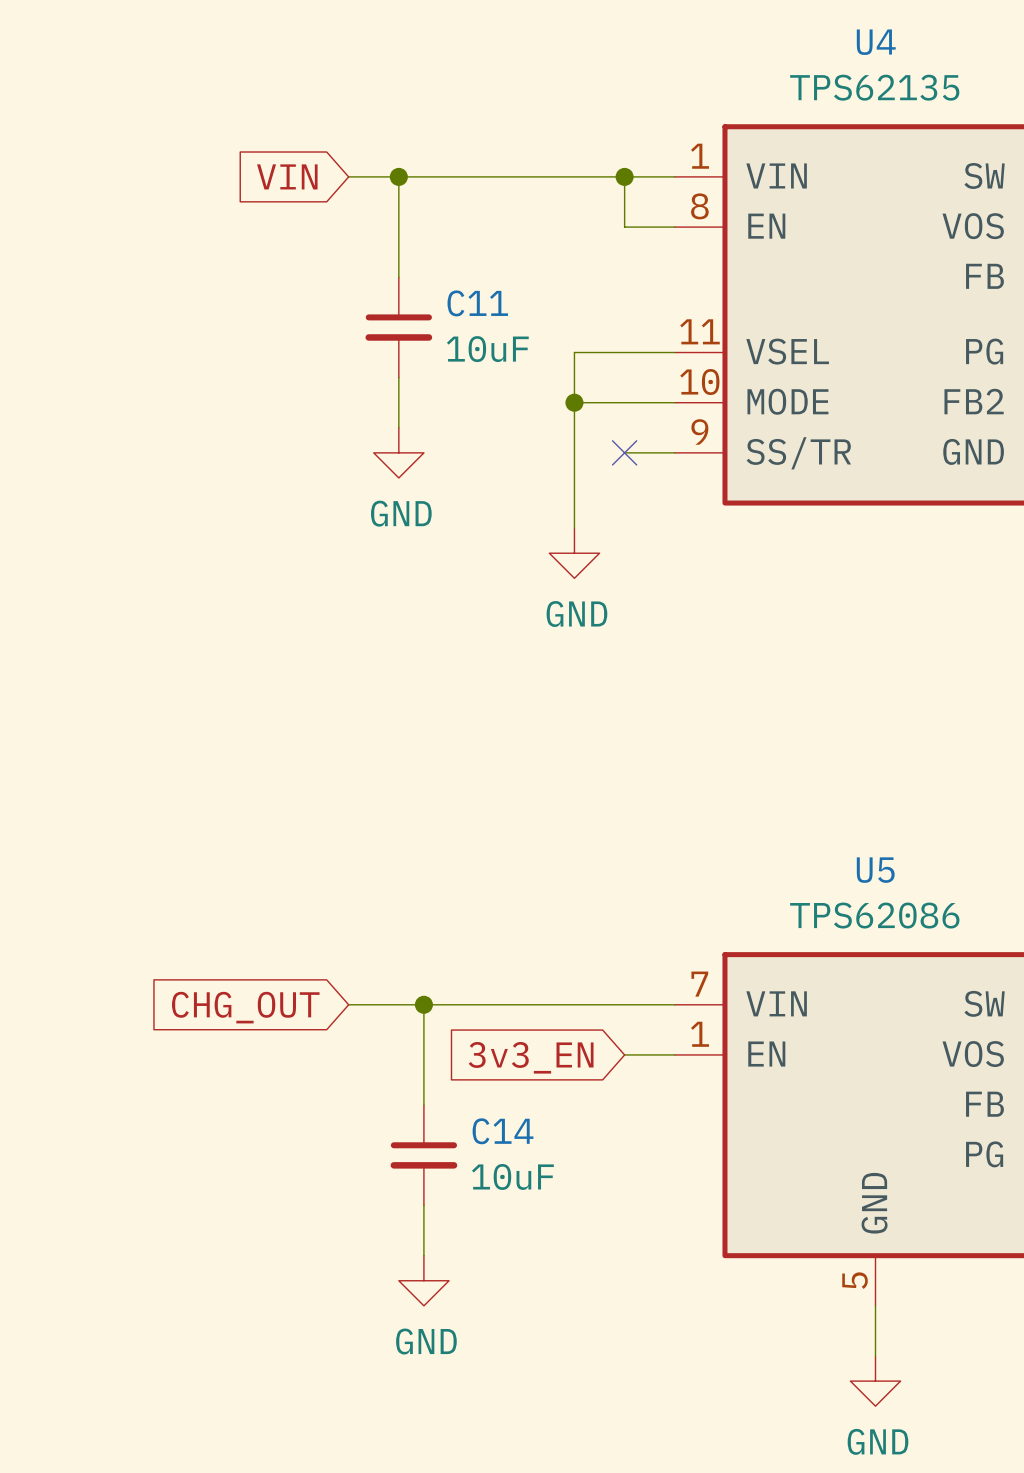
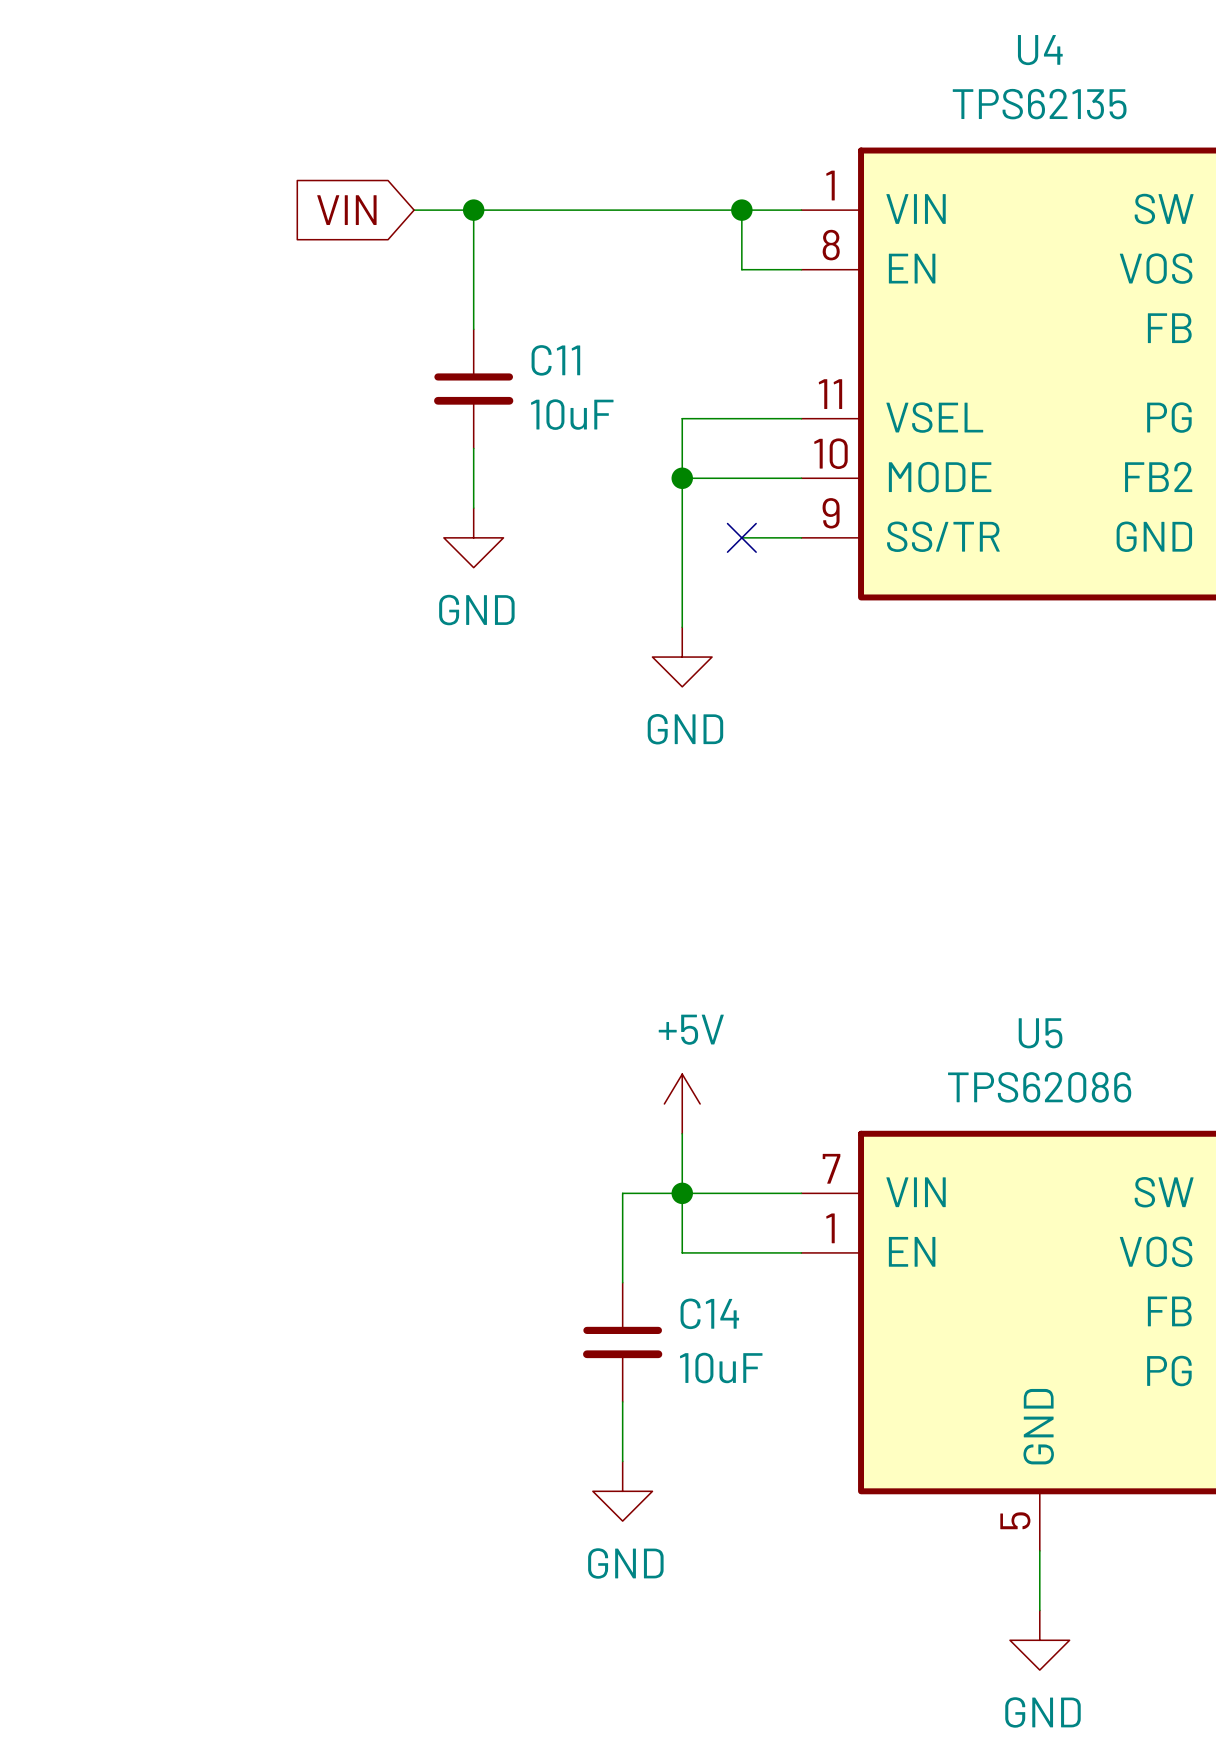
power symbol: none -> +5V (682, 1103)
wire: none -> (682, 1133) (682, 1252) (741, 1252)
wire: (348, 1004) (524, 1004) -> (622, 1282) (622, 1193)
wire: (423, 1004) (423, 1105) -> none
junction: (423, 1004) -> none
junction: none -> (682, 1193)
global label: CHG_OUT (245, 1007) -> none
global label: 3v3_EN (531, 1057) -> none
C14 position: (423, 1155) -> (622, 1342)
wire: (423, 1205) (423, 1255) -> (622, 1401) (622, 1461)
power symbol position: GND (423, 1280) -> GND (622, 1491)

